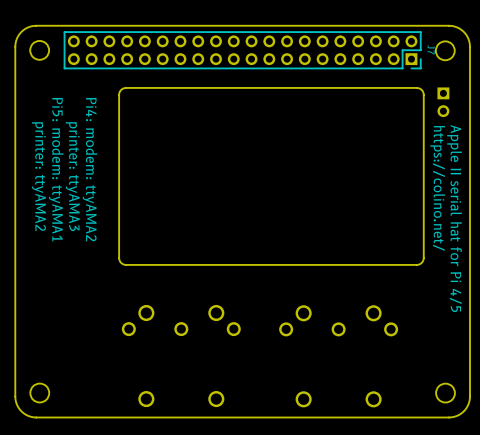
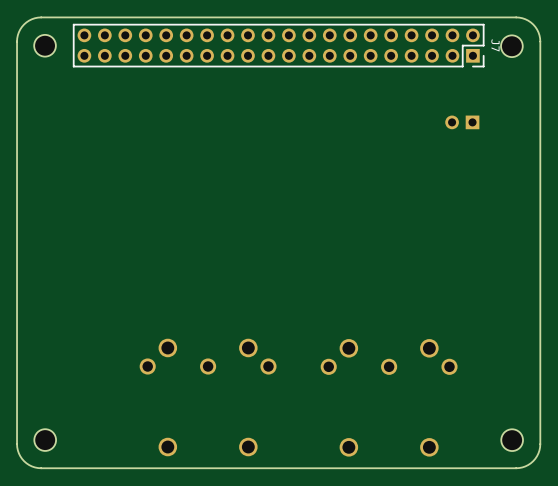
board edge: (416, 87) (122, 89) (119, 94) (120, 261) (126, 264) (420, 263) (423, 257) (423, 94) (421, 90) (416, 87) -> none
part rotation: 0° (443, 102) -> 90° clockwise (462, 122)
part position: (443, 102) -> (462, 122)
text: Pi5: modem: ttyAMA1 (56, 169) -> none
text: Pi4: modem: ttyAMA2 (90, 169) -> none
text: printer: ttyAMA2 (38, 176) -> none
text: printer: ttyAMA3 (72, 176) -> none
text: https://colino.net/ (437, 188) -> none
text: Apple II serial hat for Pi 4/5 (454, 218) -> none

